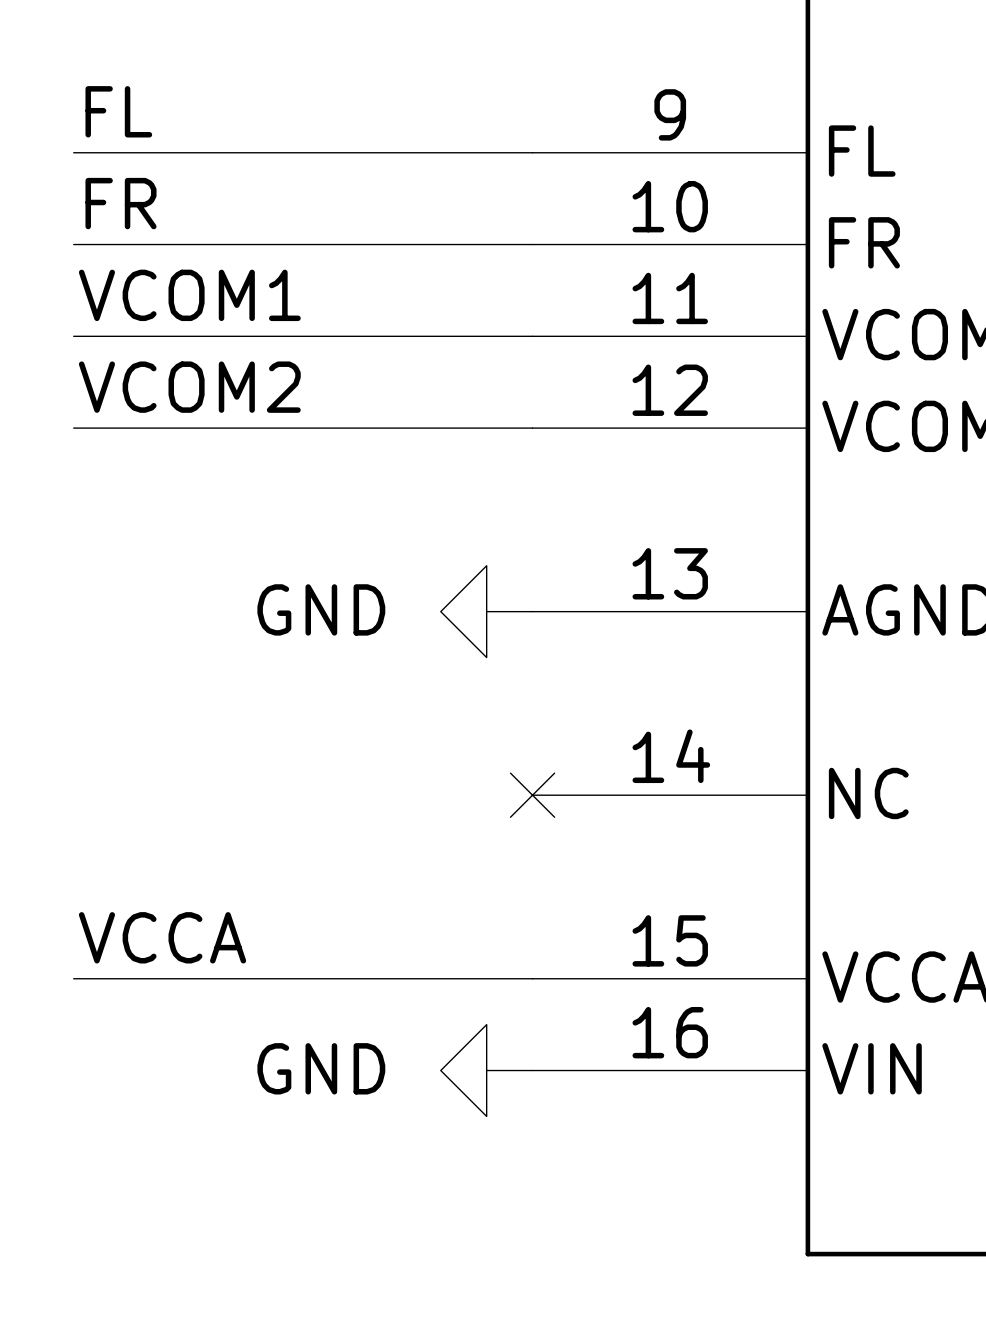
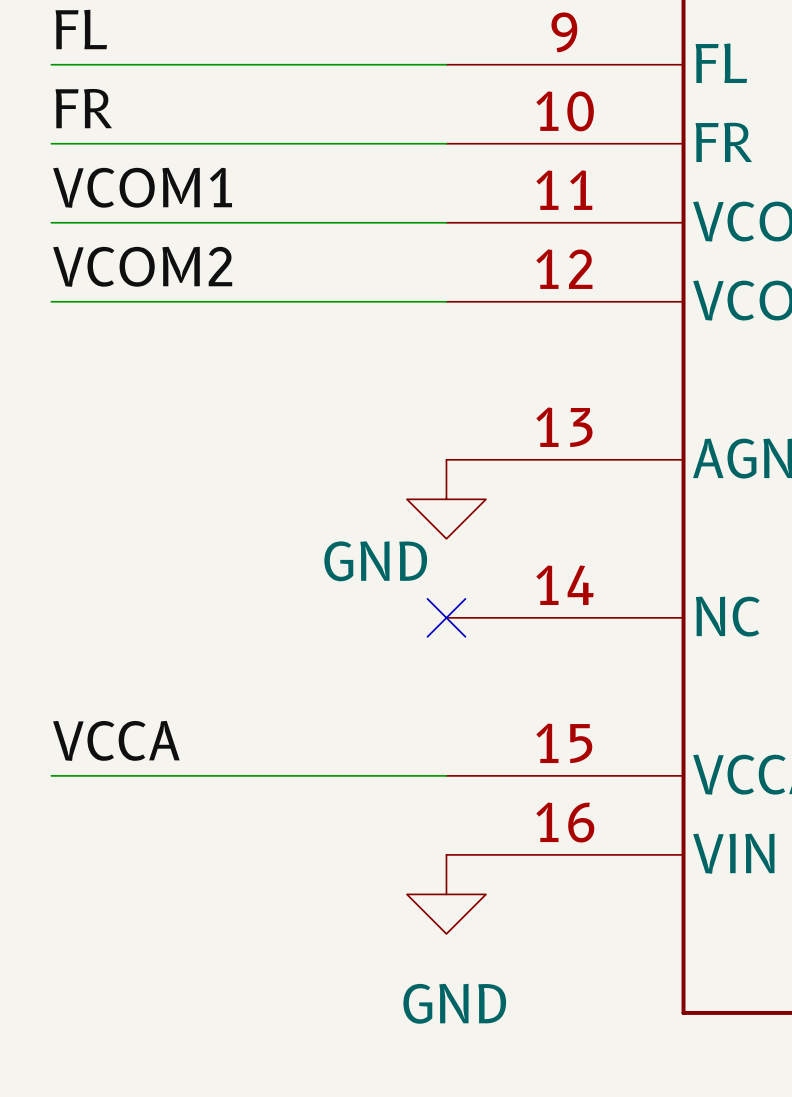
power symbol text position: GND (321, 609) -> GND (375, 561)
power symbol rotation: 0° (486, 611) -> 90° counterclockwise (446, 499)
power symbol position: GND (486, 611) -> GND (446, 499)
power symbol rotation: 0° (486, 1070) -> 90° counterclockwise (446, 894)
power symbol position: GND (486, 1070) -> GND (446, 894)

